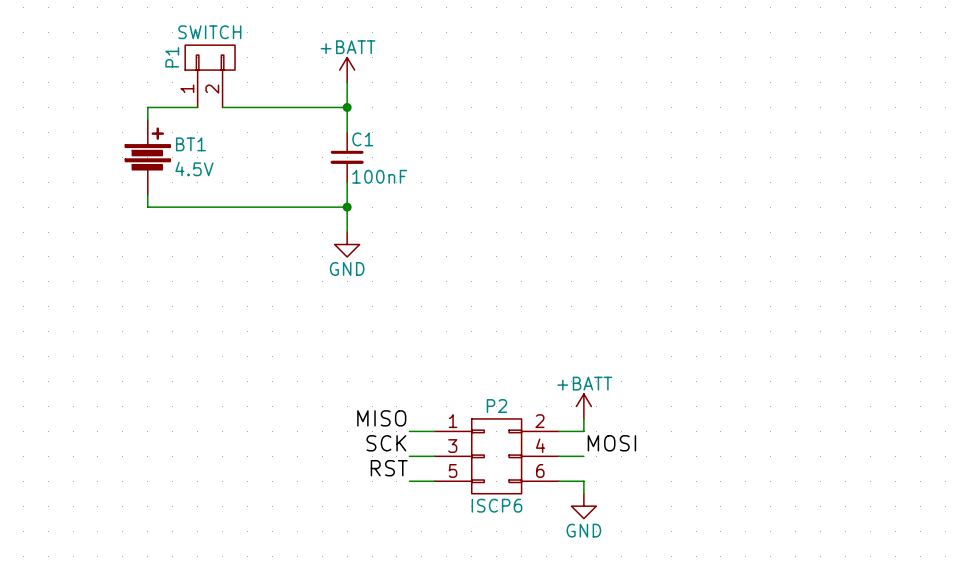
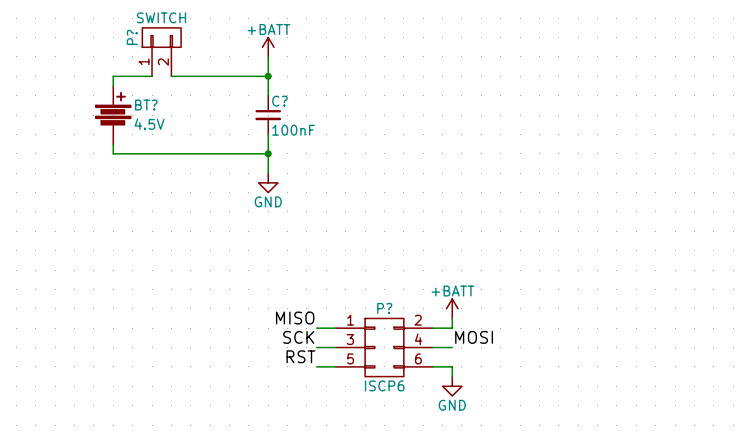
P1 name: P1 (172, 57) -> P? (132, 37)
C1 name: C1 (362, 139) -> C? (279, 101)
BT1 name: BT1 (190, 144) -> BT? (146, 105)
P2 name: P2 (496, 406) -> P? (384, 308)

